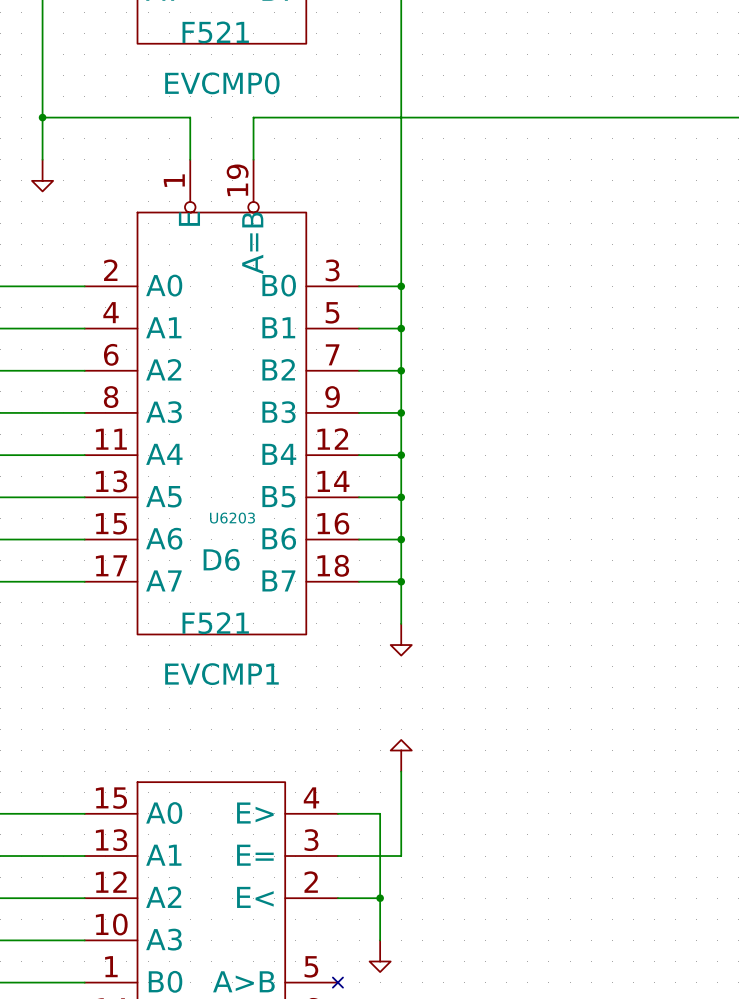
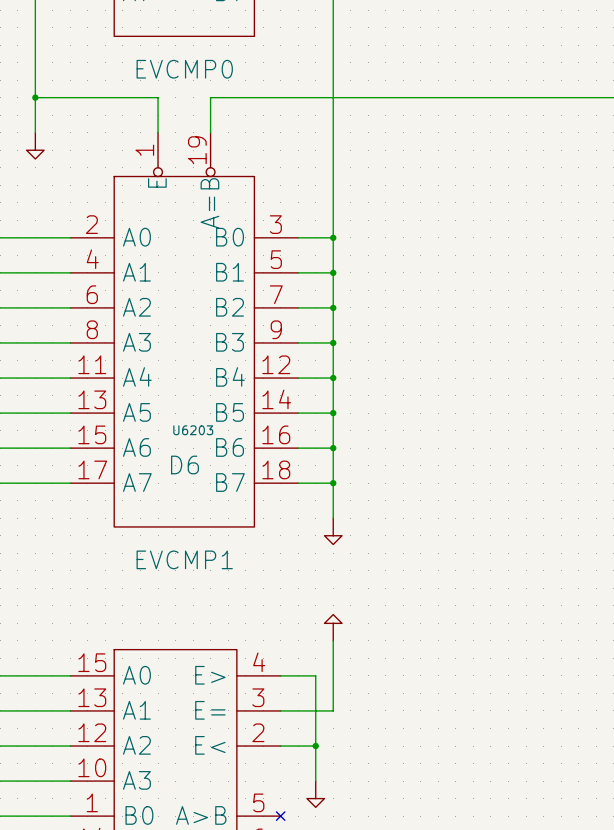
part value: F521 (215, 32) -> none
U6203 value: F521 (215, 623) -> none

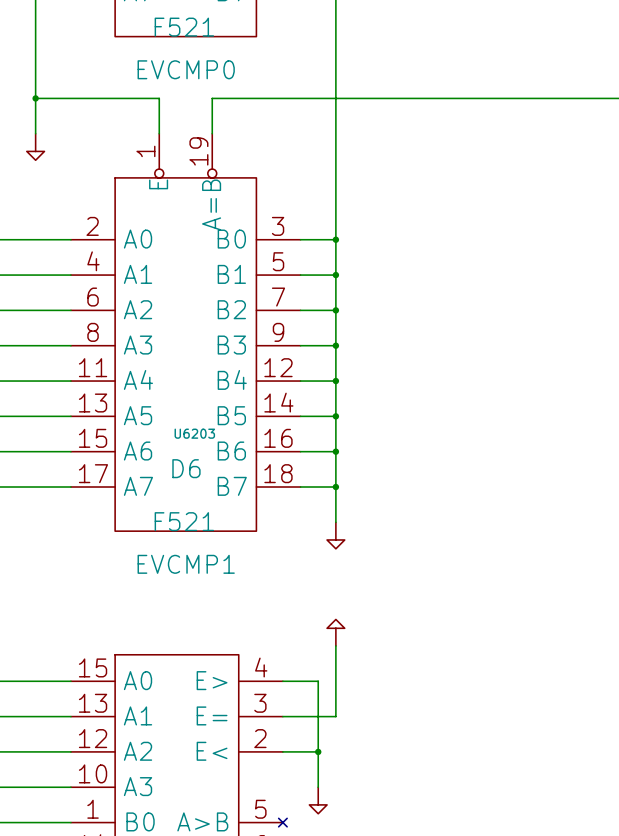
part value: none -> F521 (184, 27)
U6203 value: none -> F521 (184, 521)

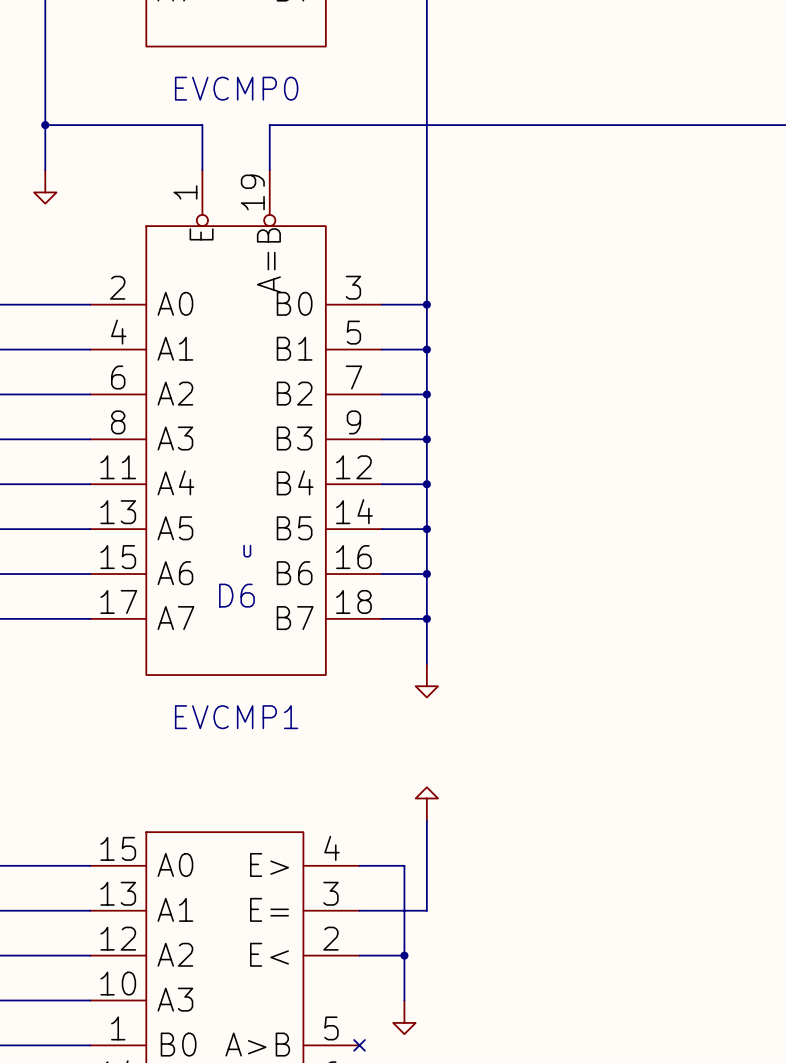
part value: F521 (184, 27) -> none
U6203 name: U6203 (194, 433) -> U (247, 551)
U6203 value: F521 (184, 521) -> none

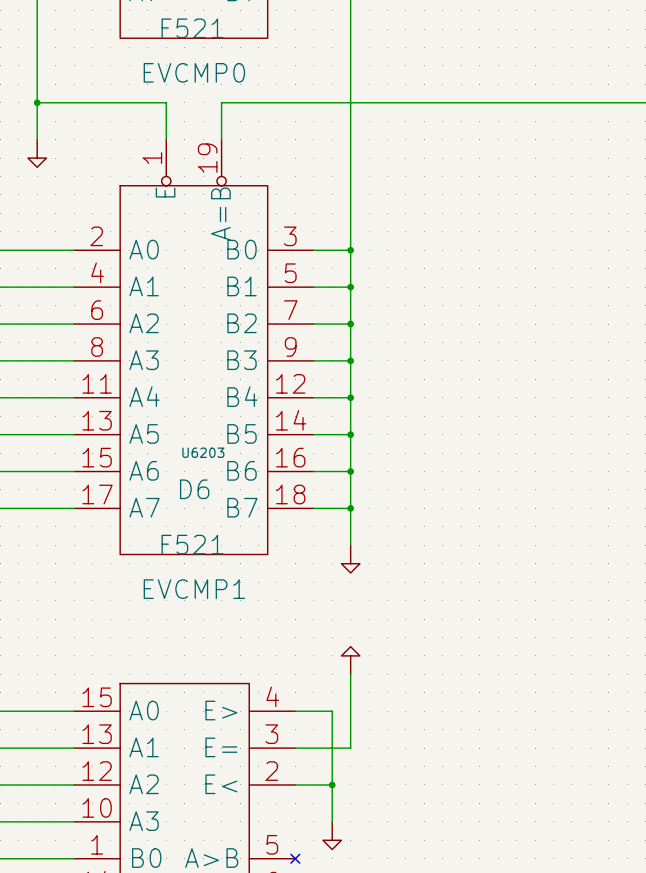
part value: none -> F521 (192, 28)
U name: U (247, 551) -> U6203 (203, 452)
U value: none -> F521 (192, 544)

